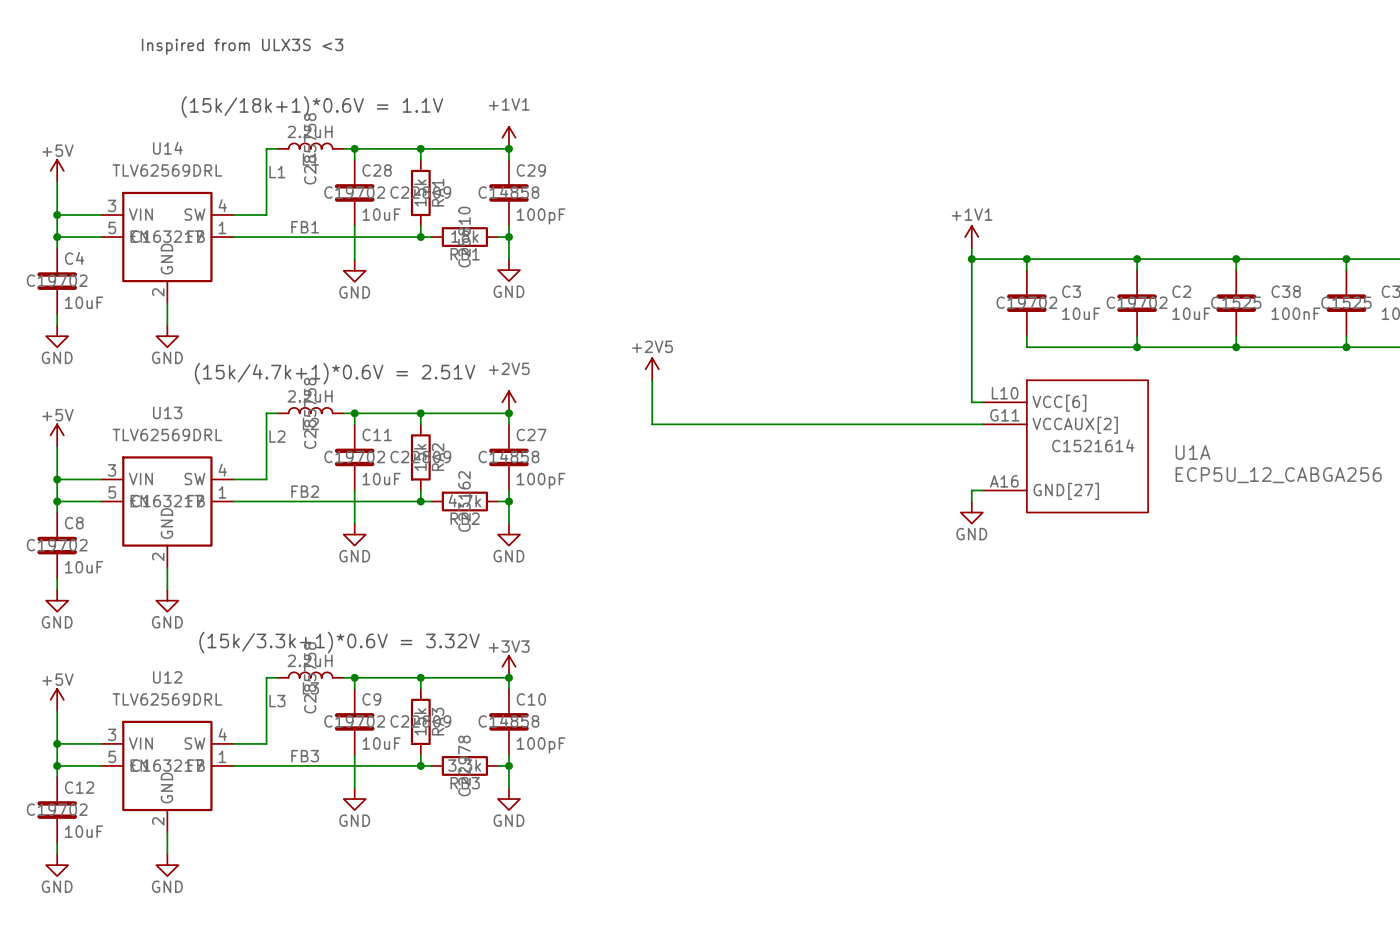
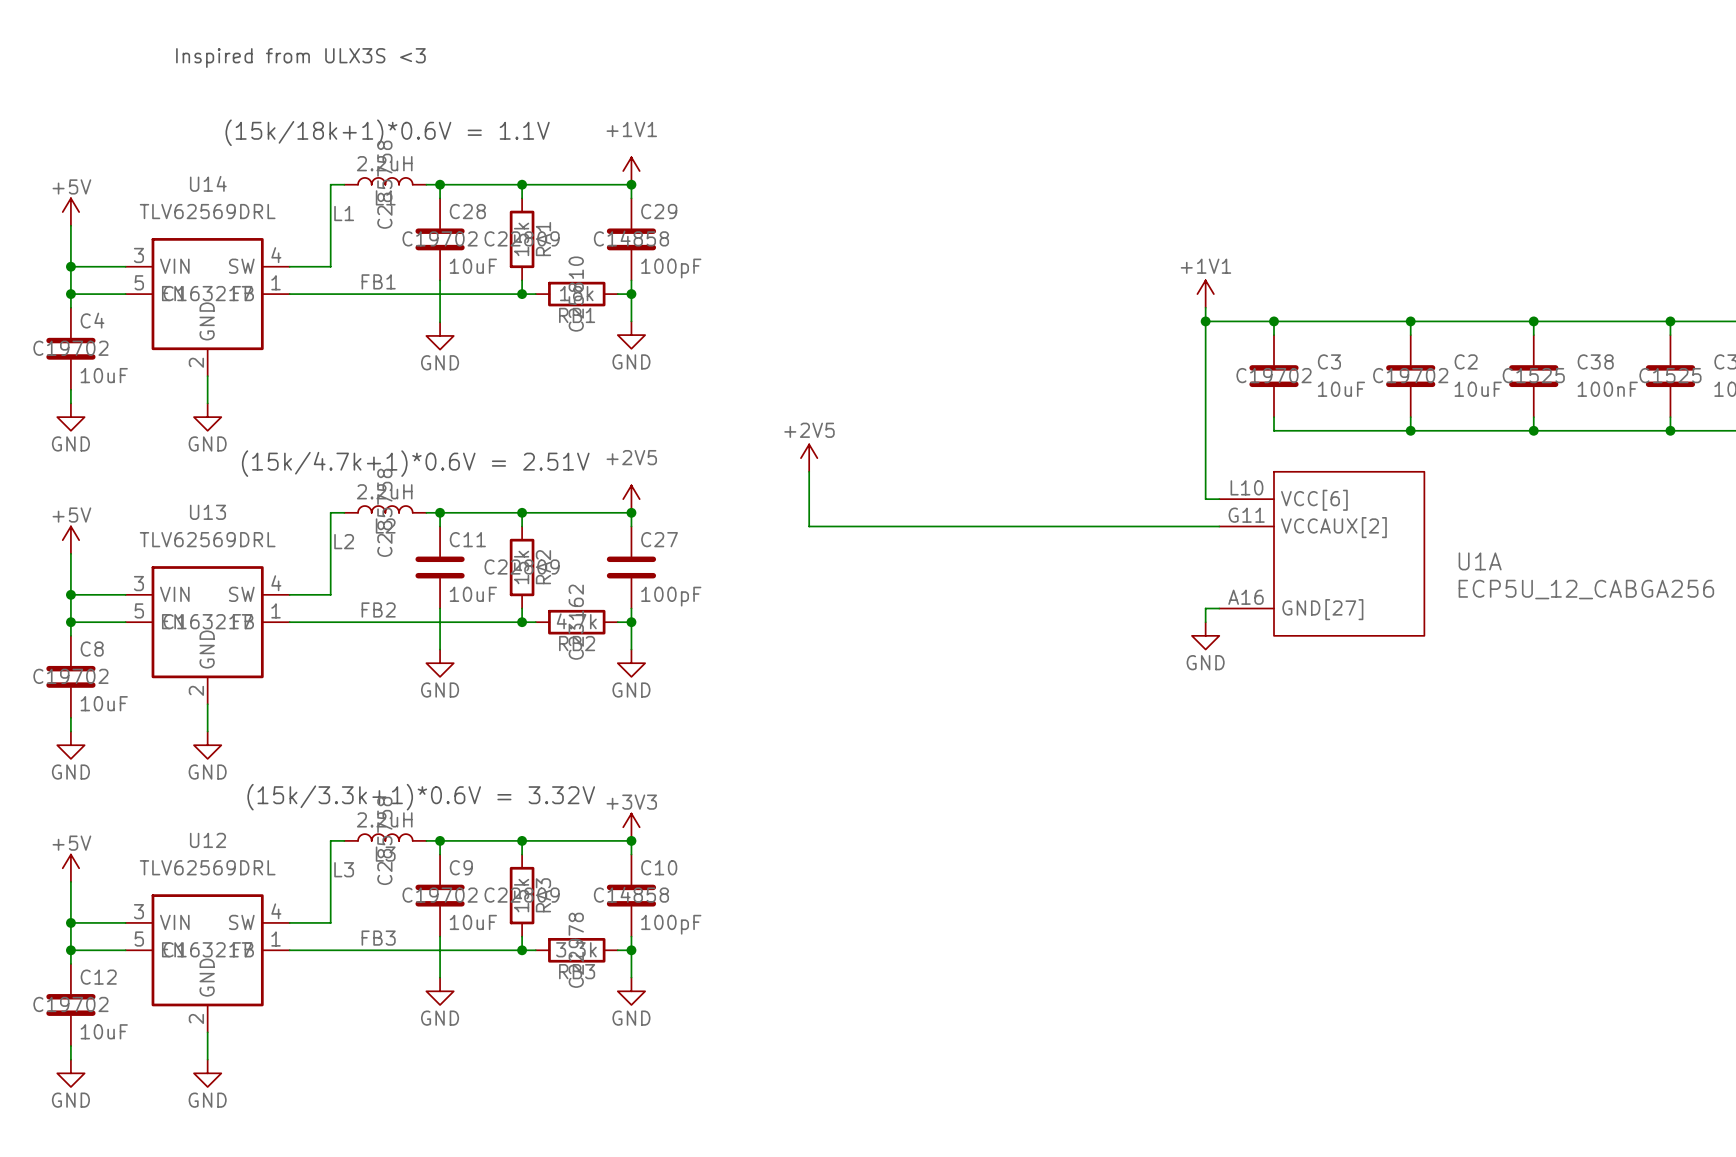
U1A text: C1521614 (1093, 445) -> none
C27 text: C14858 (508, 456) -> none
C11 text: C19702 (354, 457) -> none

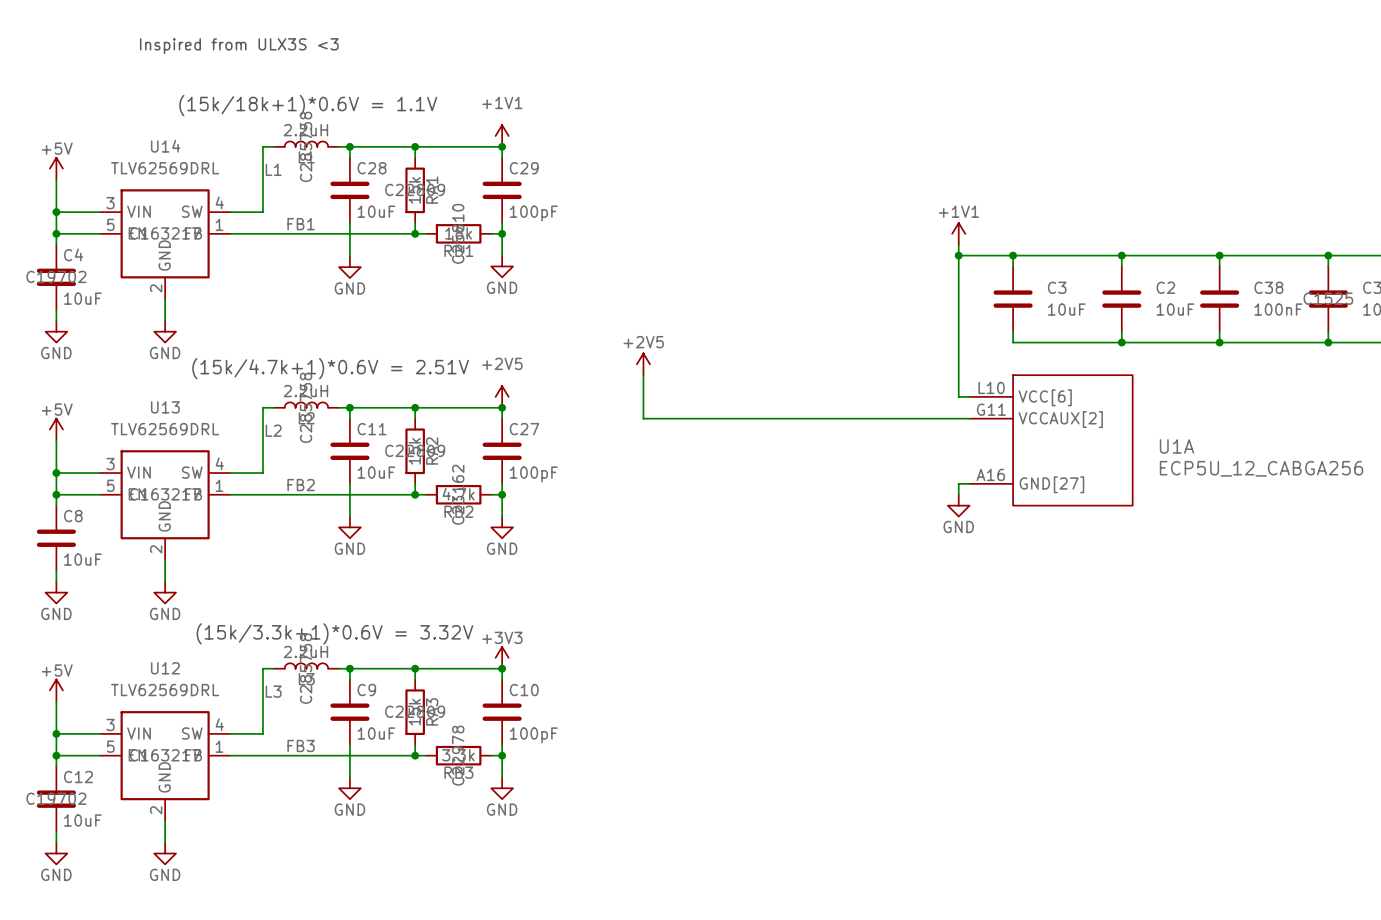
C28 text: C19702 (440, 238) -> none
C29 text: C14858 (631, 238) -> none
C3 text: C19702 (1273, 375) -> none
C2 text: C19702 (1410, 375) -> none
C38 text: C1525 (1533, 375) -> none
C8 text: C19702 (70, 676) -> none
C10 text: C14858 (631, 894) -> none
C9 text: C19702 (440, 895) -> none

